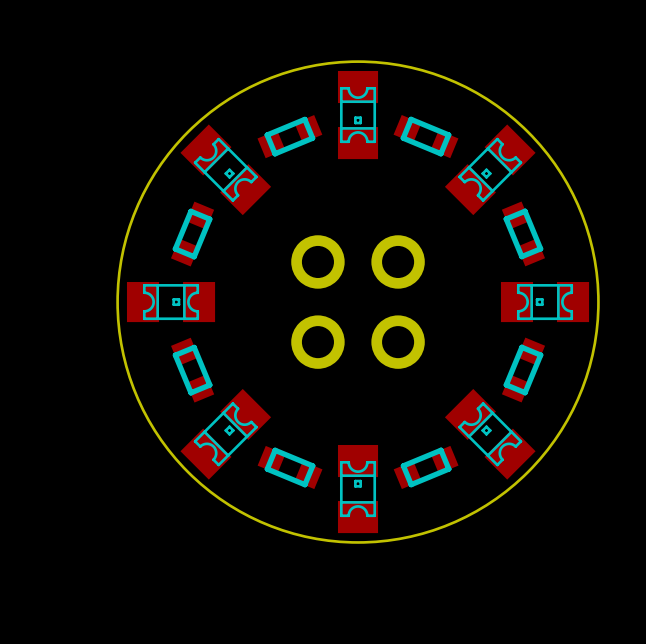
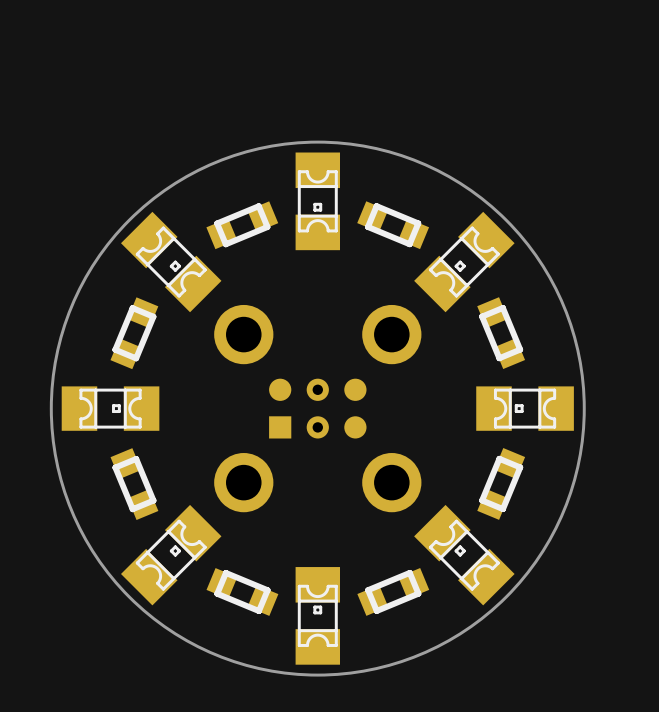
part position: (317, 261) -> (243, 334)
part position: (398, 261) -> (391, 334)
part: none -> (317, 408)
part position: (317, 342) -> (243, 482)
part position: (398, 342) -> (391, 482)

